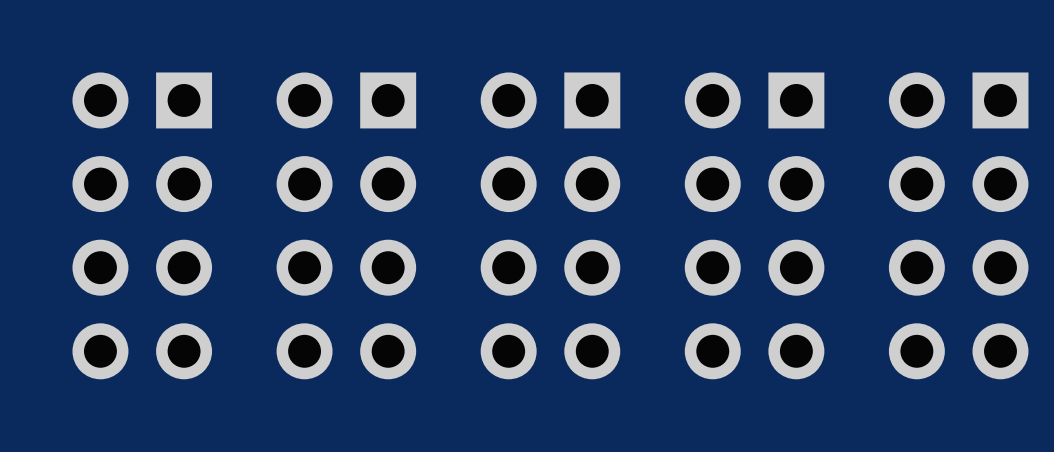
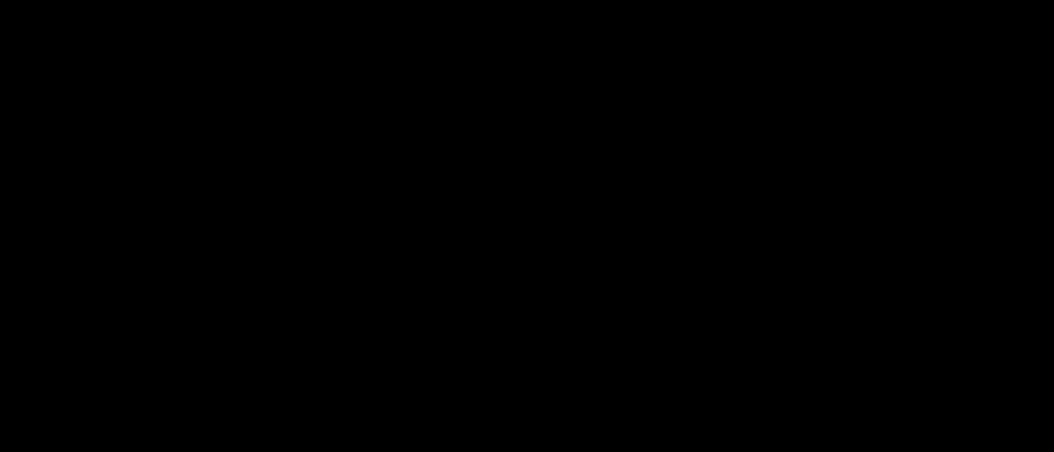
part: (142, 225) -> none
part: (346, 225) -> none
part: (550, 225) -> none
part: (754, 225) -> none
part: (958, 225) -> none

